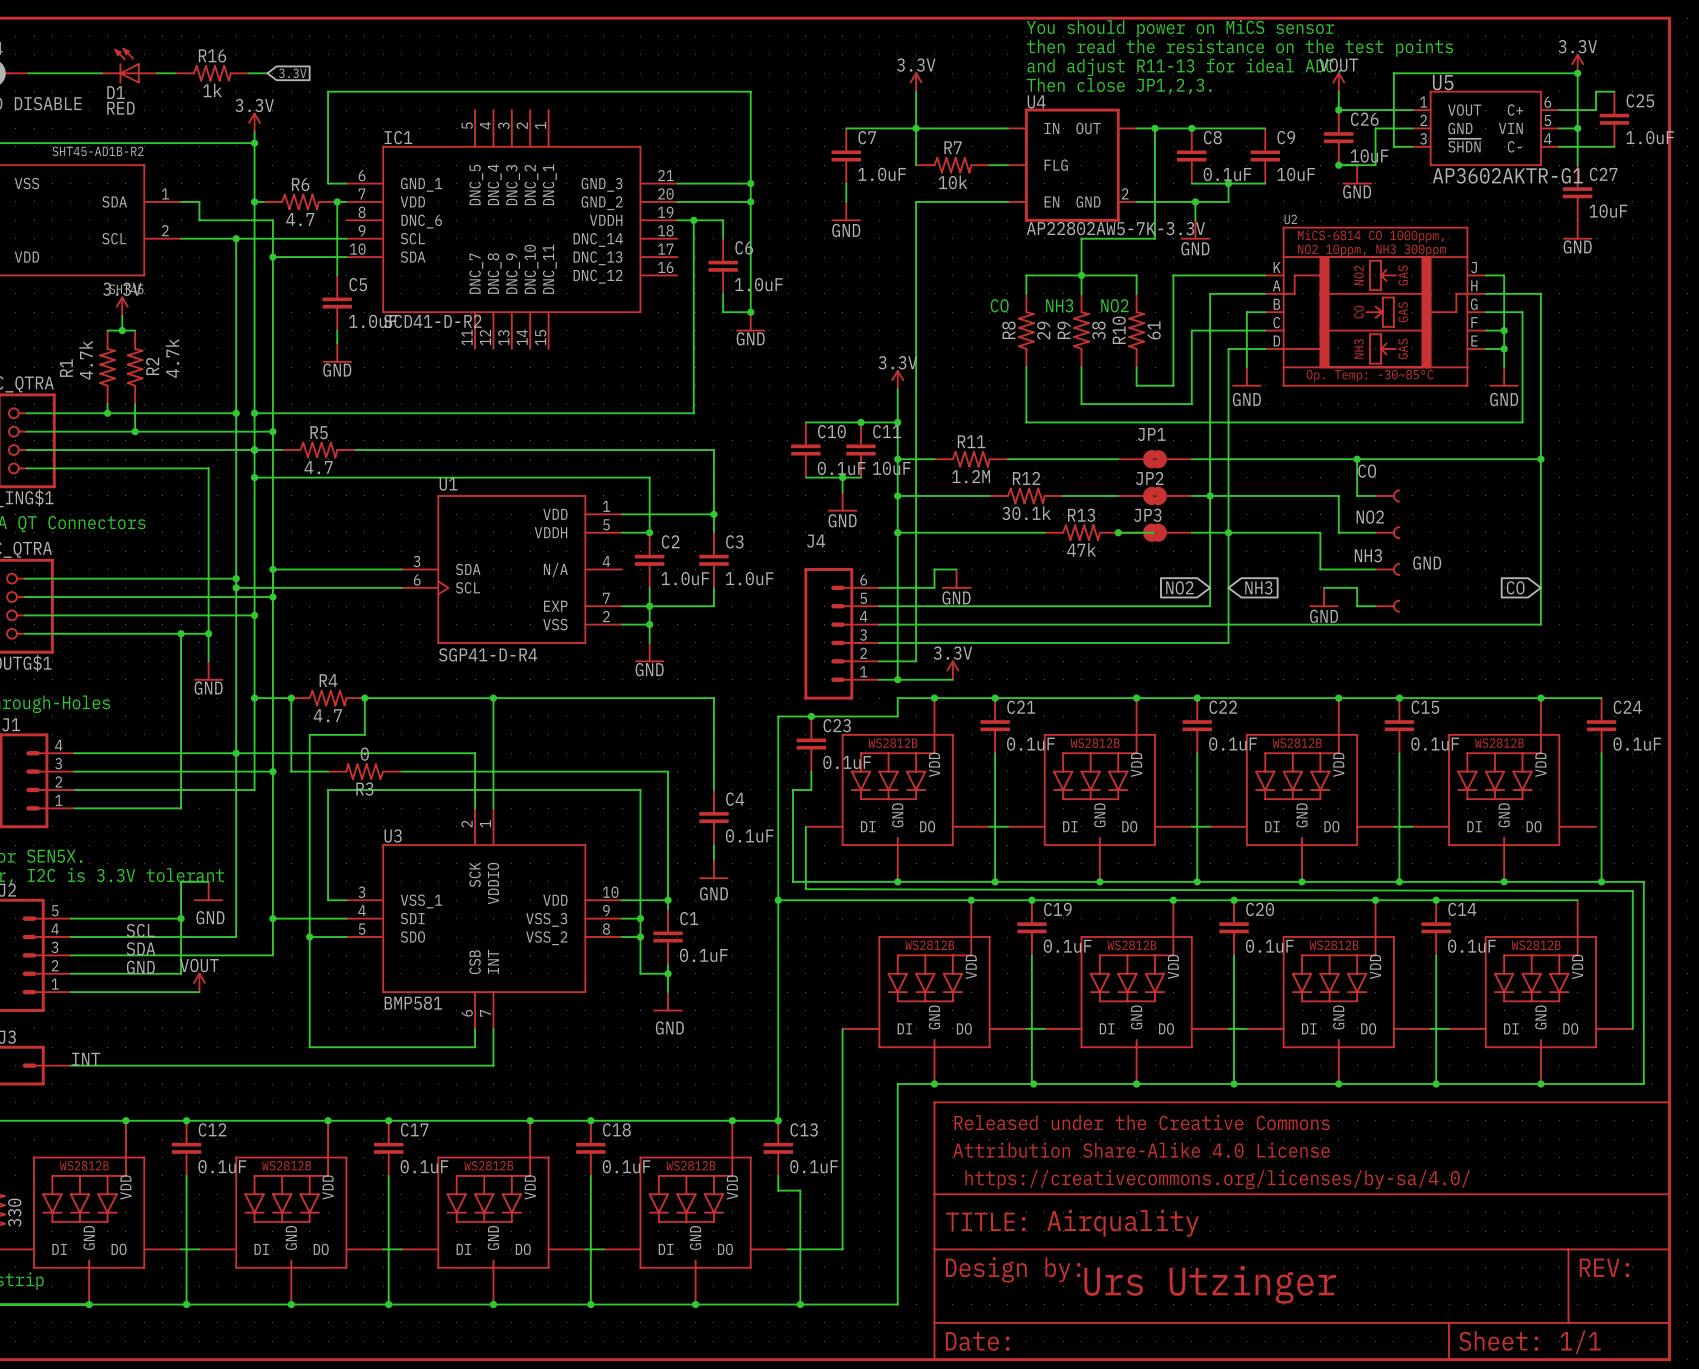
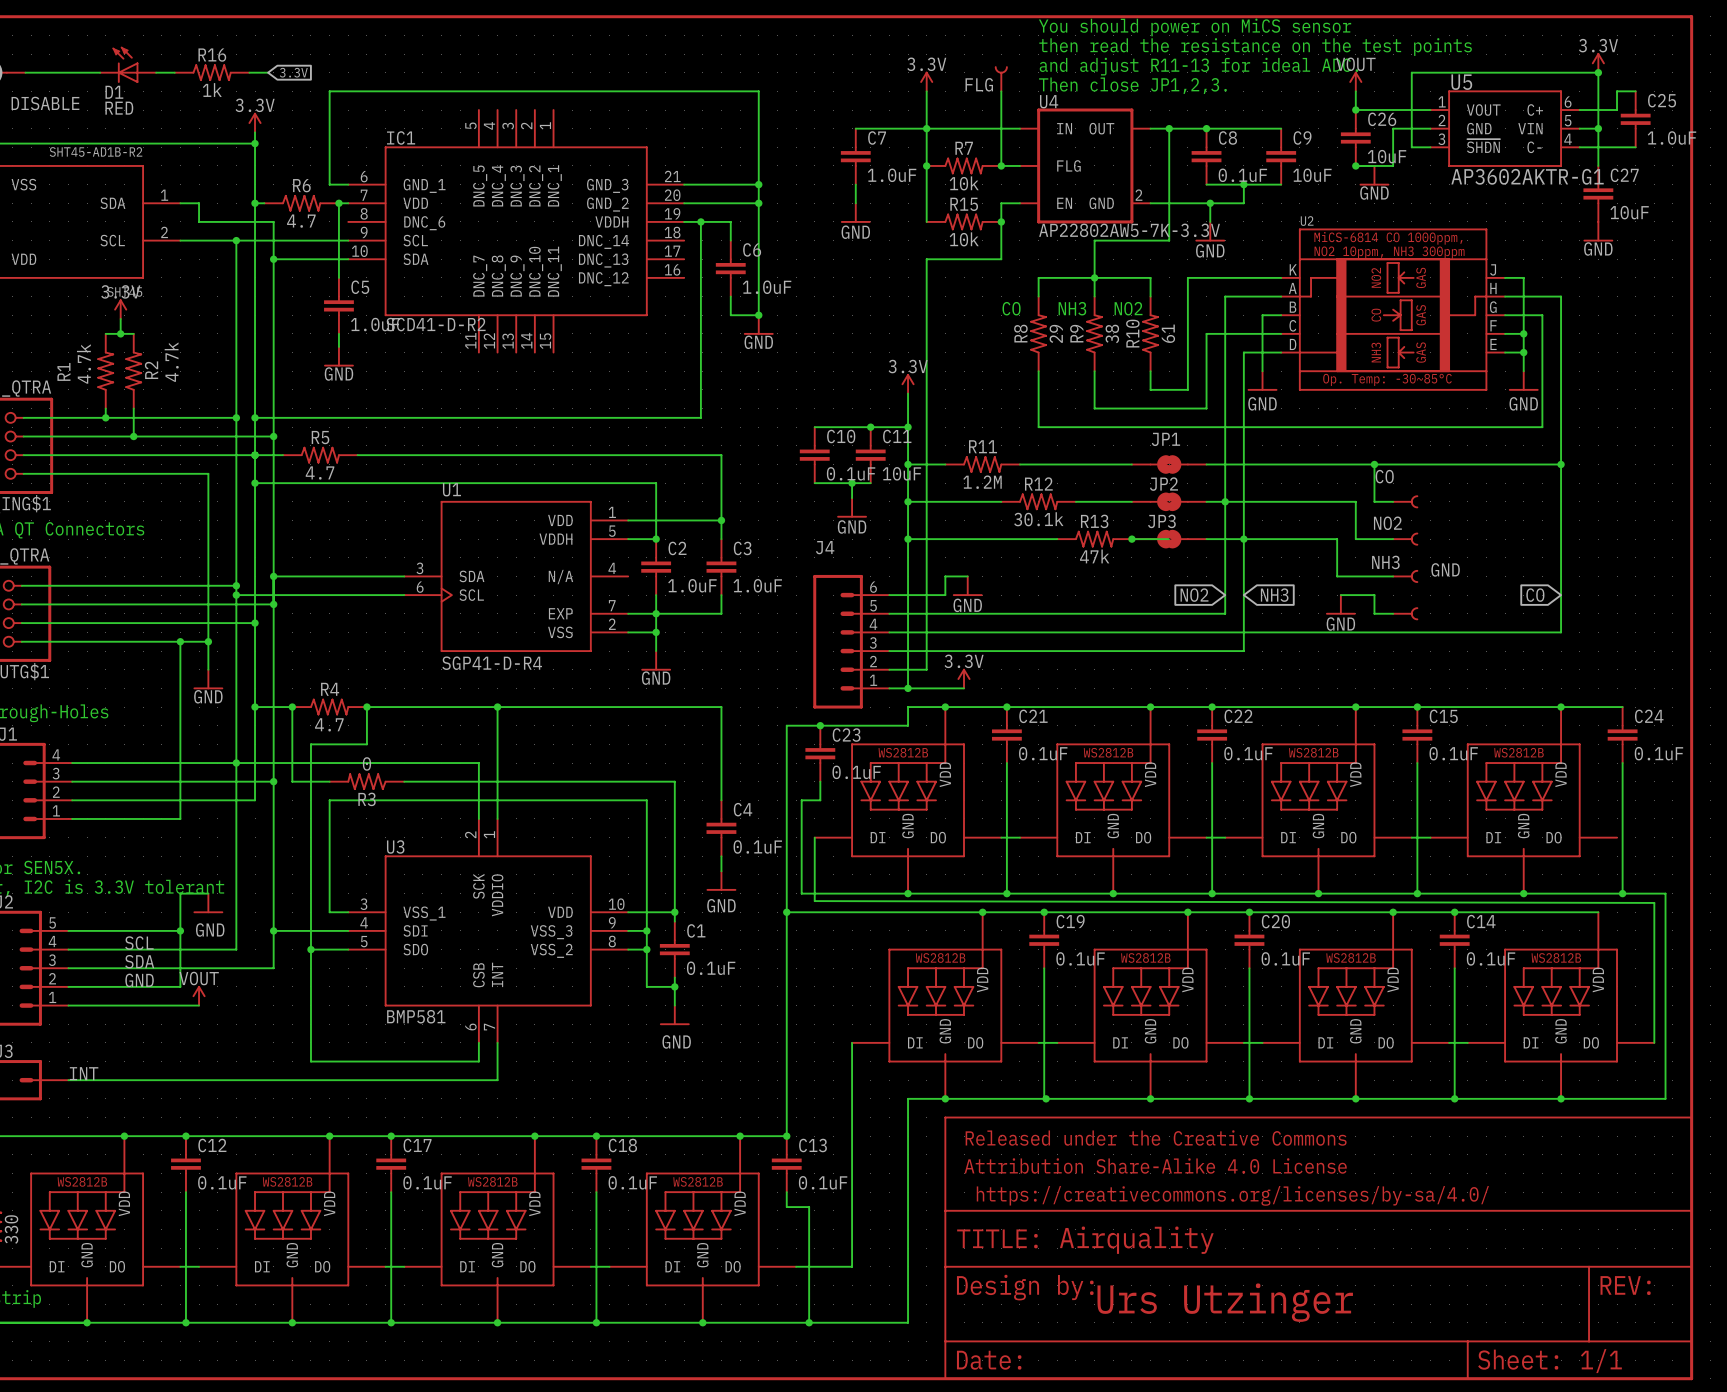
FLG: none -> (1001, 79)
wire: none -> (1001, 91) (1001, 165)
junction: none -> (926, 165)
junction: none -> (1001, 165)
wire: (916, 201) (989, 201) -> (926, 259) (1001, 259) (1001, 203)
wire: (916, 220) (916, 257) -> (926, 165) (926, 203)
R15: none -> 10k (964, 221)
junction: none -> (1001, 221)

